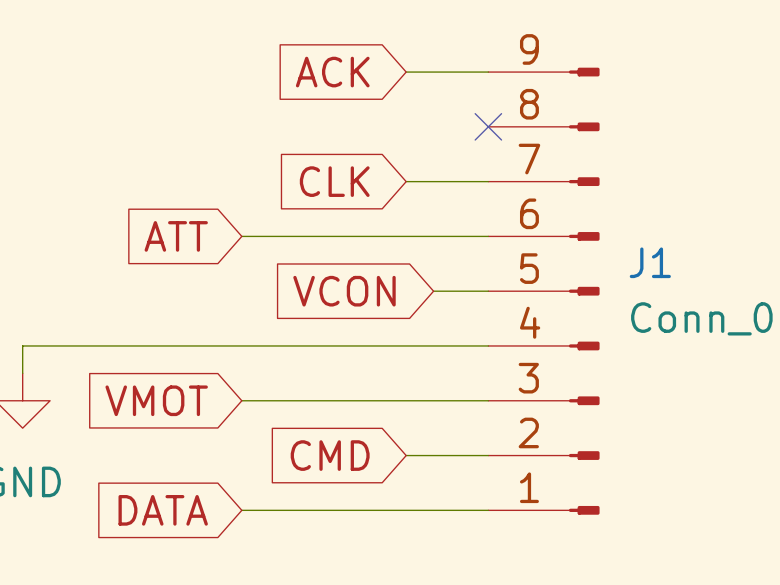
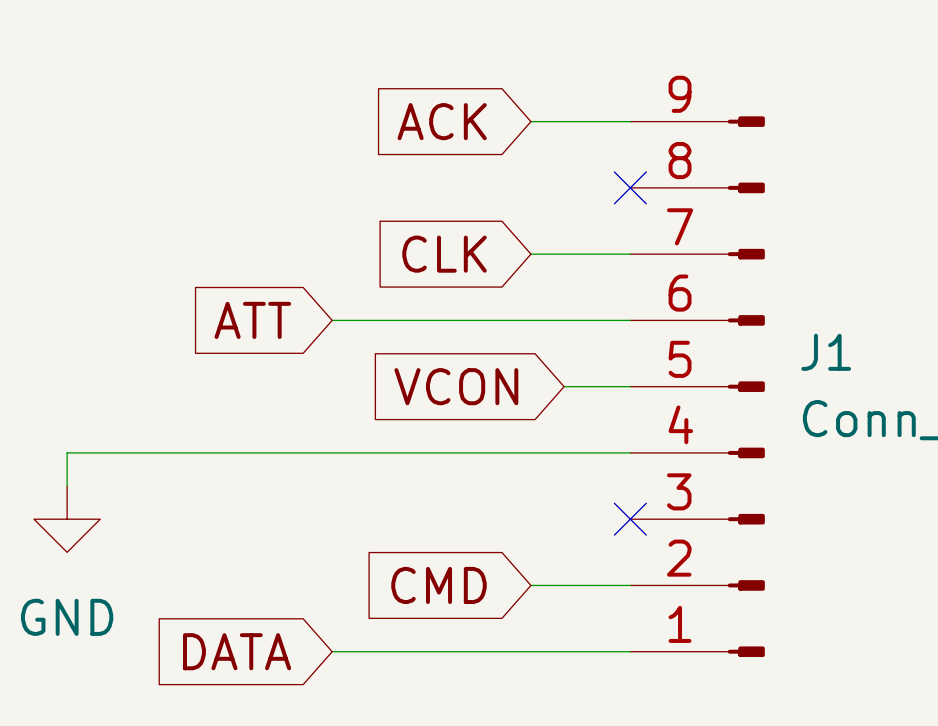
global label: VMOT (156, 400) -> none
wire: (241, 400) (488, 400) -> none
no-connect mark: none -> (630, 519)

